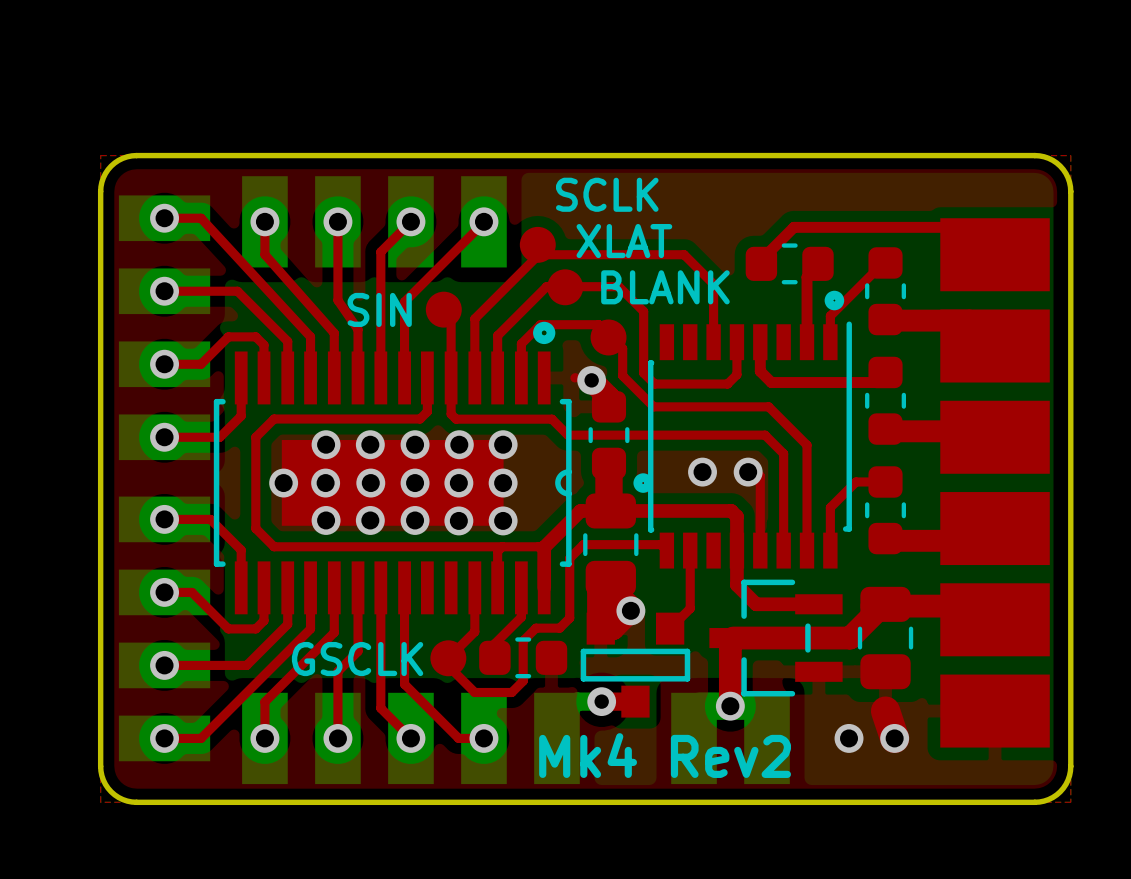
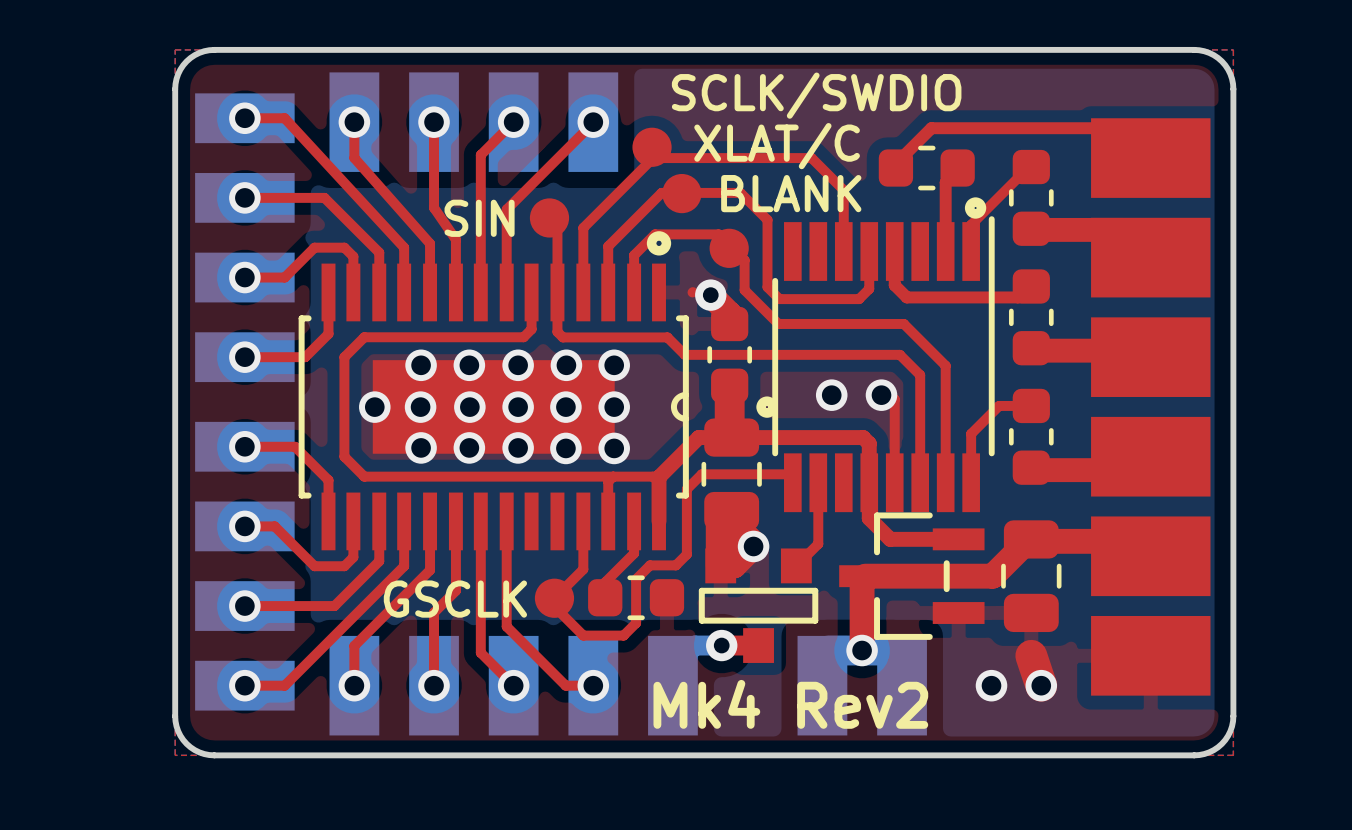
text: SCLK (607, 194) -> SCLK/SWDIO (816, 95)
text: XLAT (624, 241) -> XLAT/C (777, 146)
part footprint: [648, 321, 852, 569] -> [772, 216, 995, 513]

